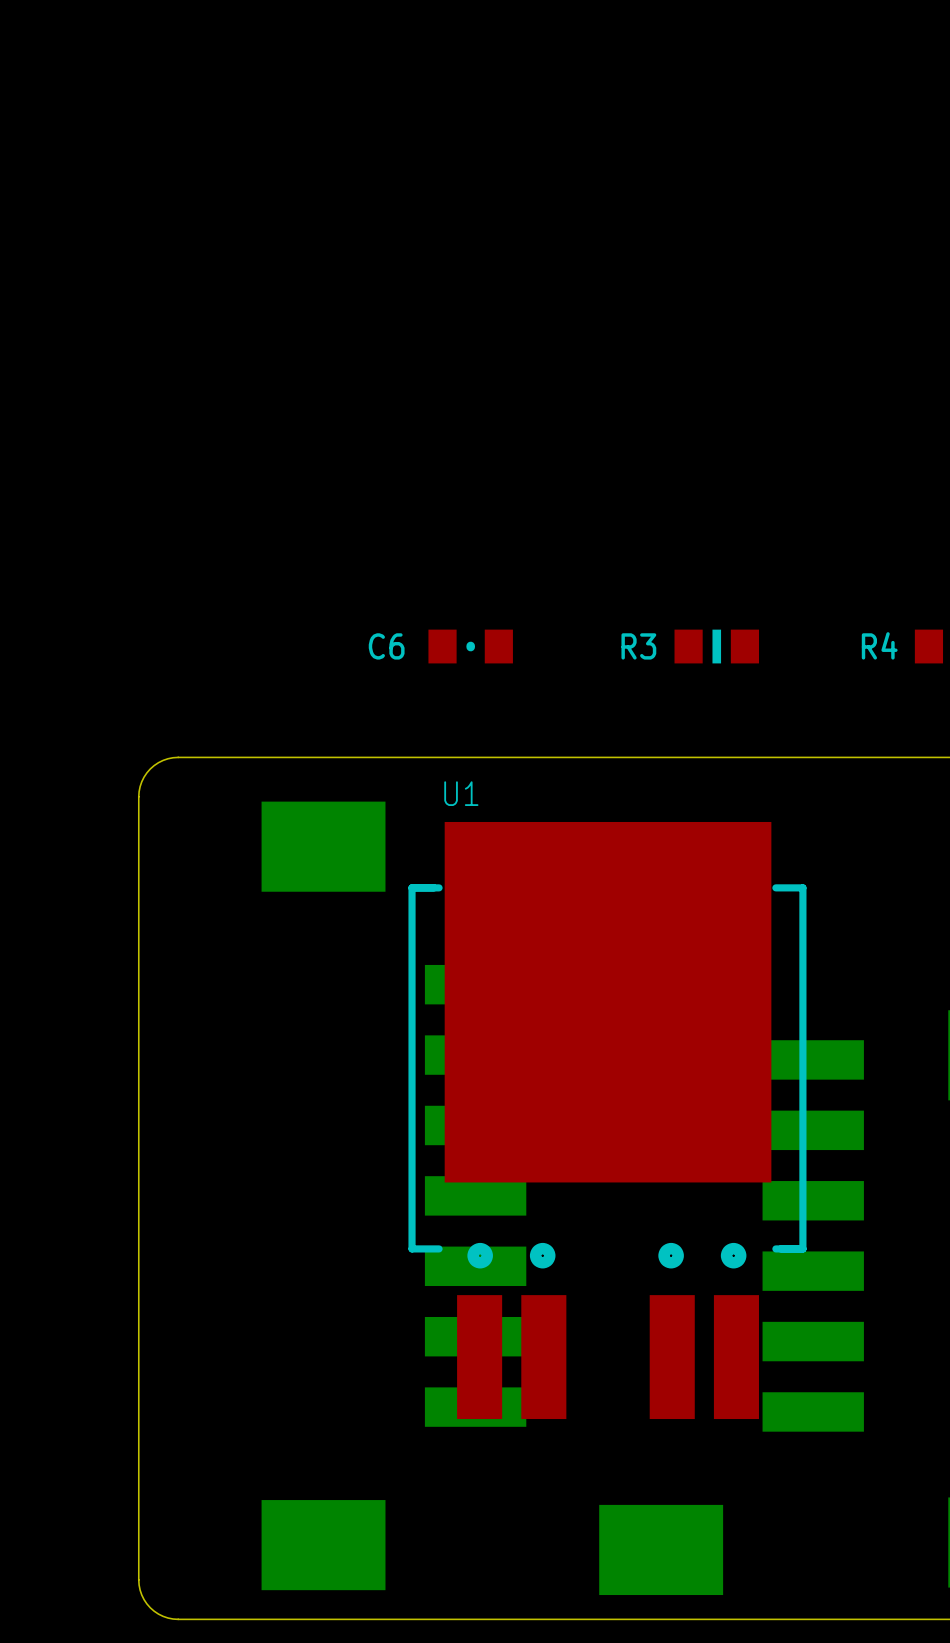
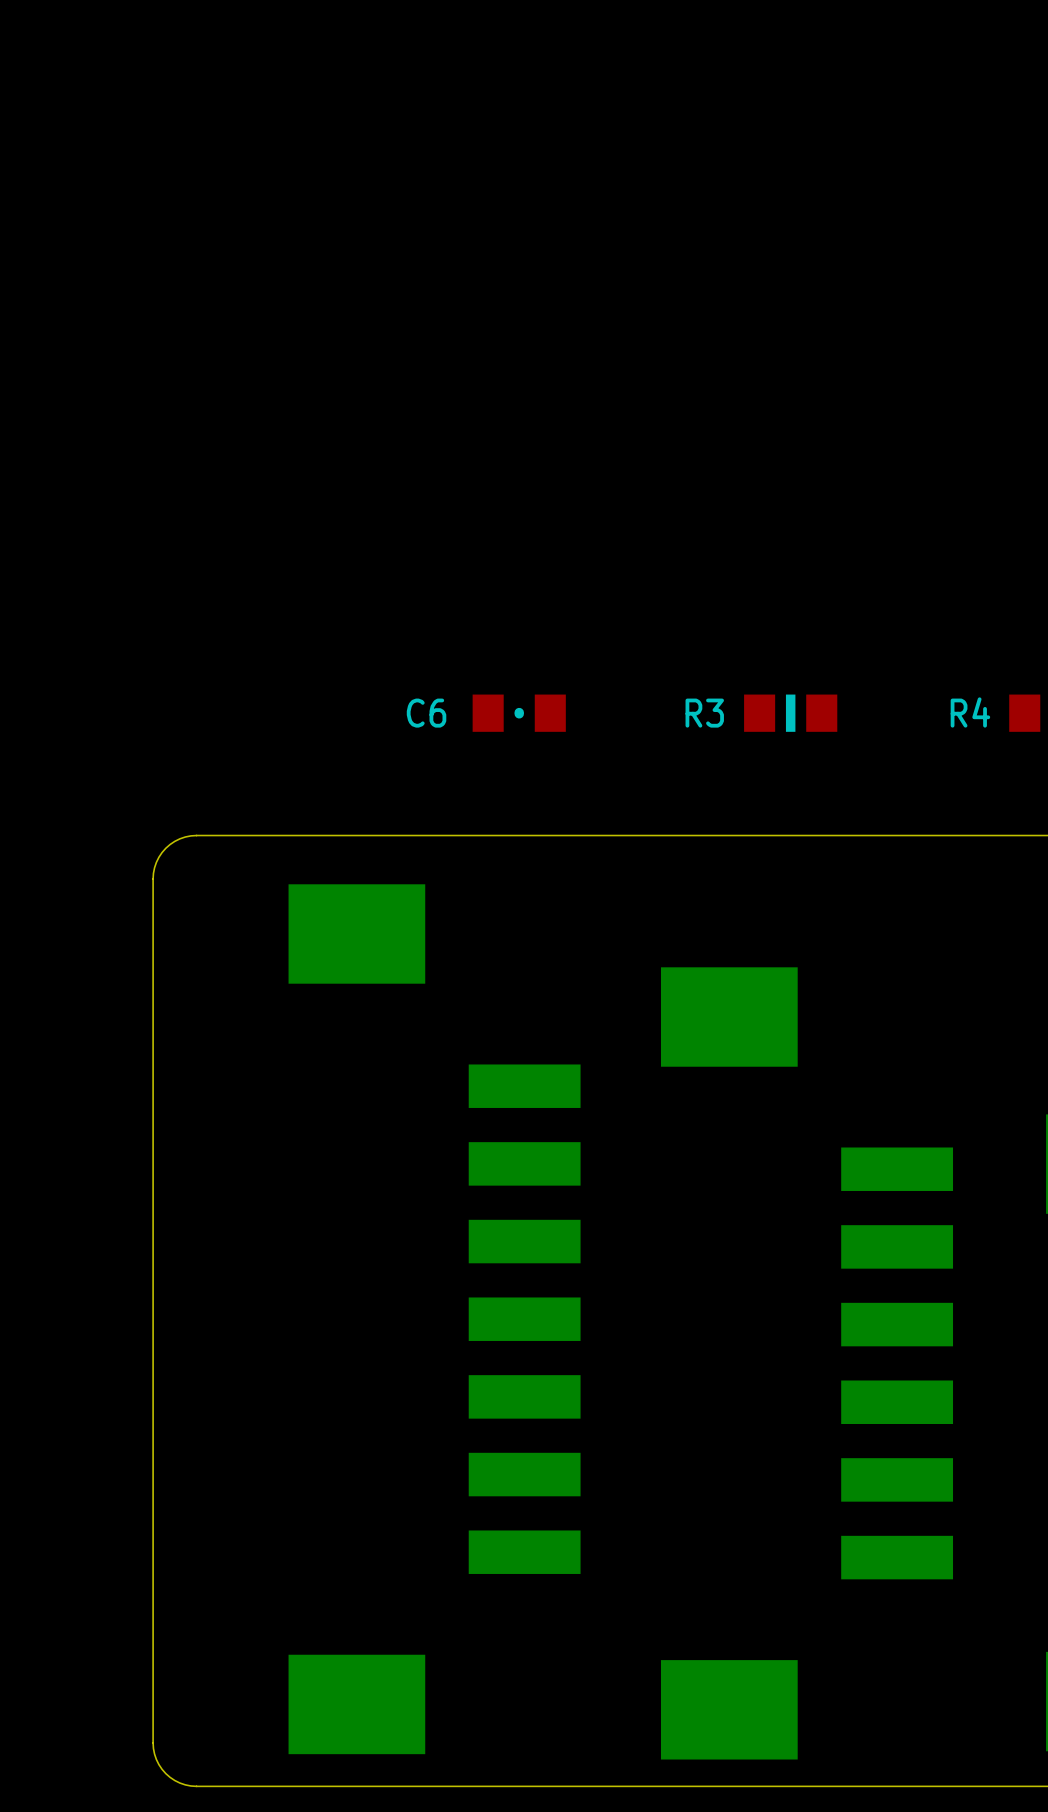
U1: (607, 1120) -> none

